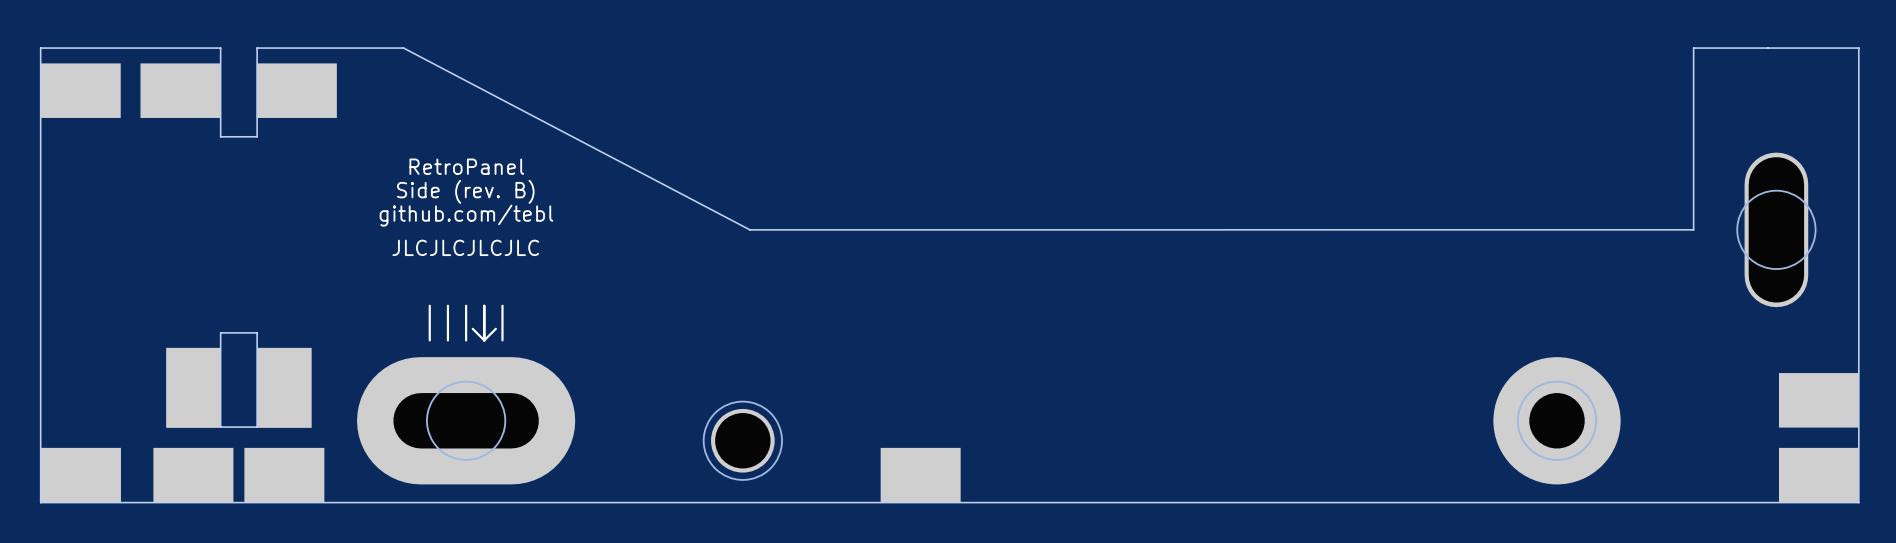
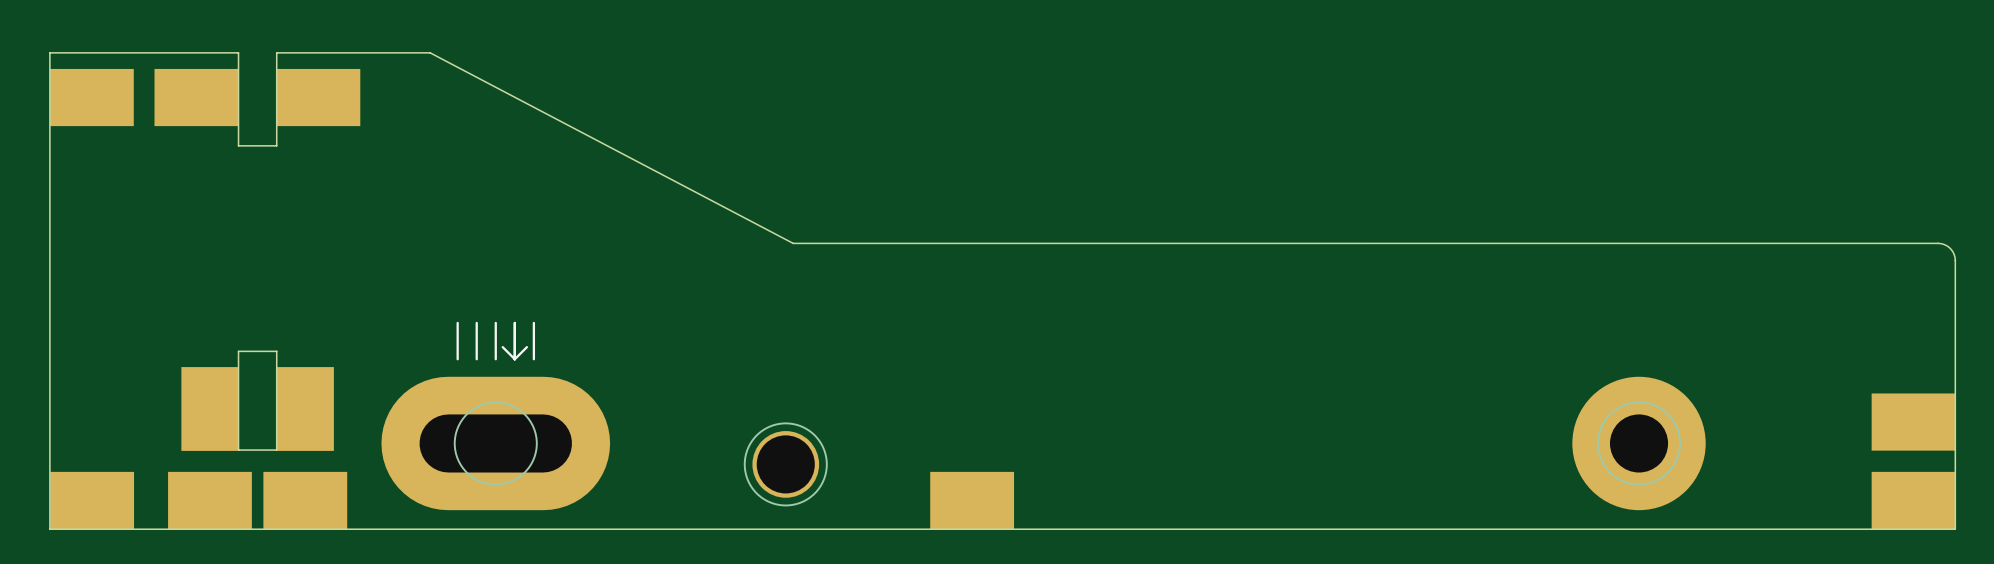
text: RetroPanel (466, 166) -> none
text: Side (rev. B) (465, 191) -> none
text: github.com/tebl (466, 215) -> none
board edge: (1693, 229) (1693, 48) (1858, 48) (1858, 246) -> (1782, 243) (1939, 243) (1950, 248) (1955, 260)
part: (1776, 229) -> none
text: JLCJLCJLCJLC (465, 247) -> none

